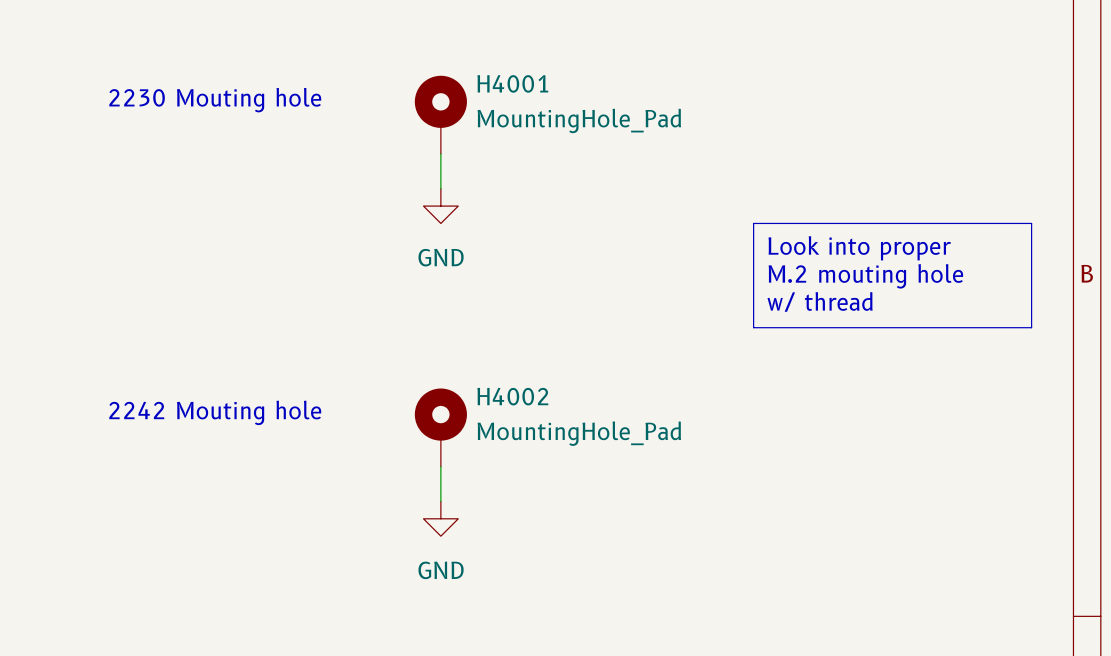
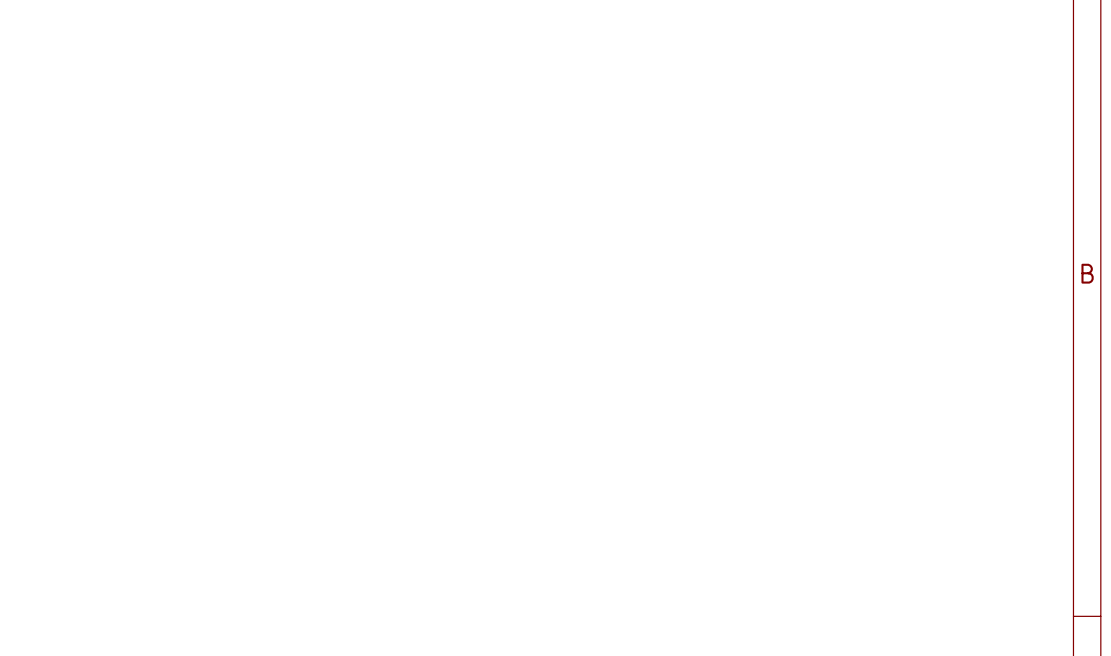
text: 2230 Mouting hole (215, 100) -> none
H4001: MountingHole_Pad (440, 114) -> none
wire: (440, 153) (440, 188) -> none
power symbol: GND (440, 206) -> none
line: (753, 223) (1031, 223) (1031, 327) (753, 327) (753, 223) -> none
text: Look into proper (859, 248) -> none
text: M.2 mouting hole (865, 276) -> none
text: w/ thread (820, 301) -> none
text: 2242 Mouting hole (215, 412) -> none
H4002: MountingHole_Pad (440, 427) -> none
wire: (440, 466) (440, 501) -> none
power symbol: GND (440, 518) -> none

